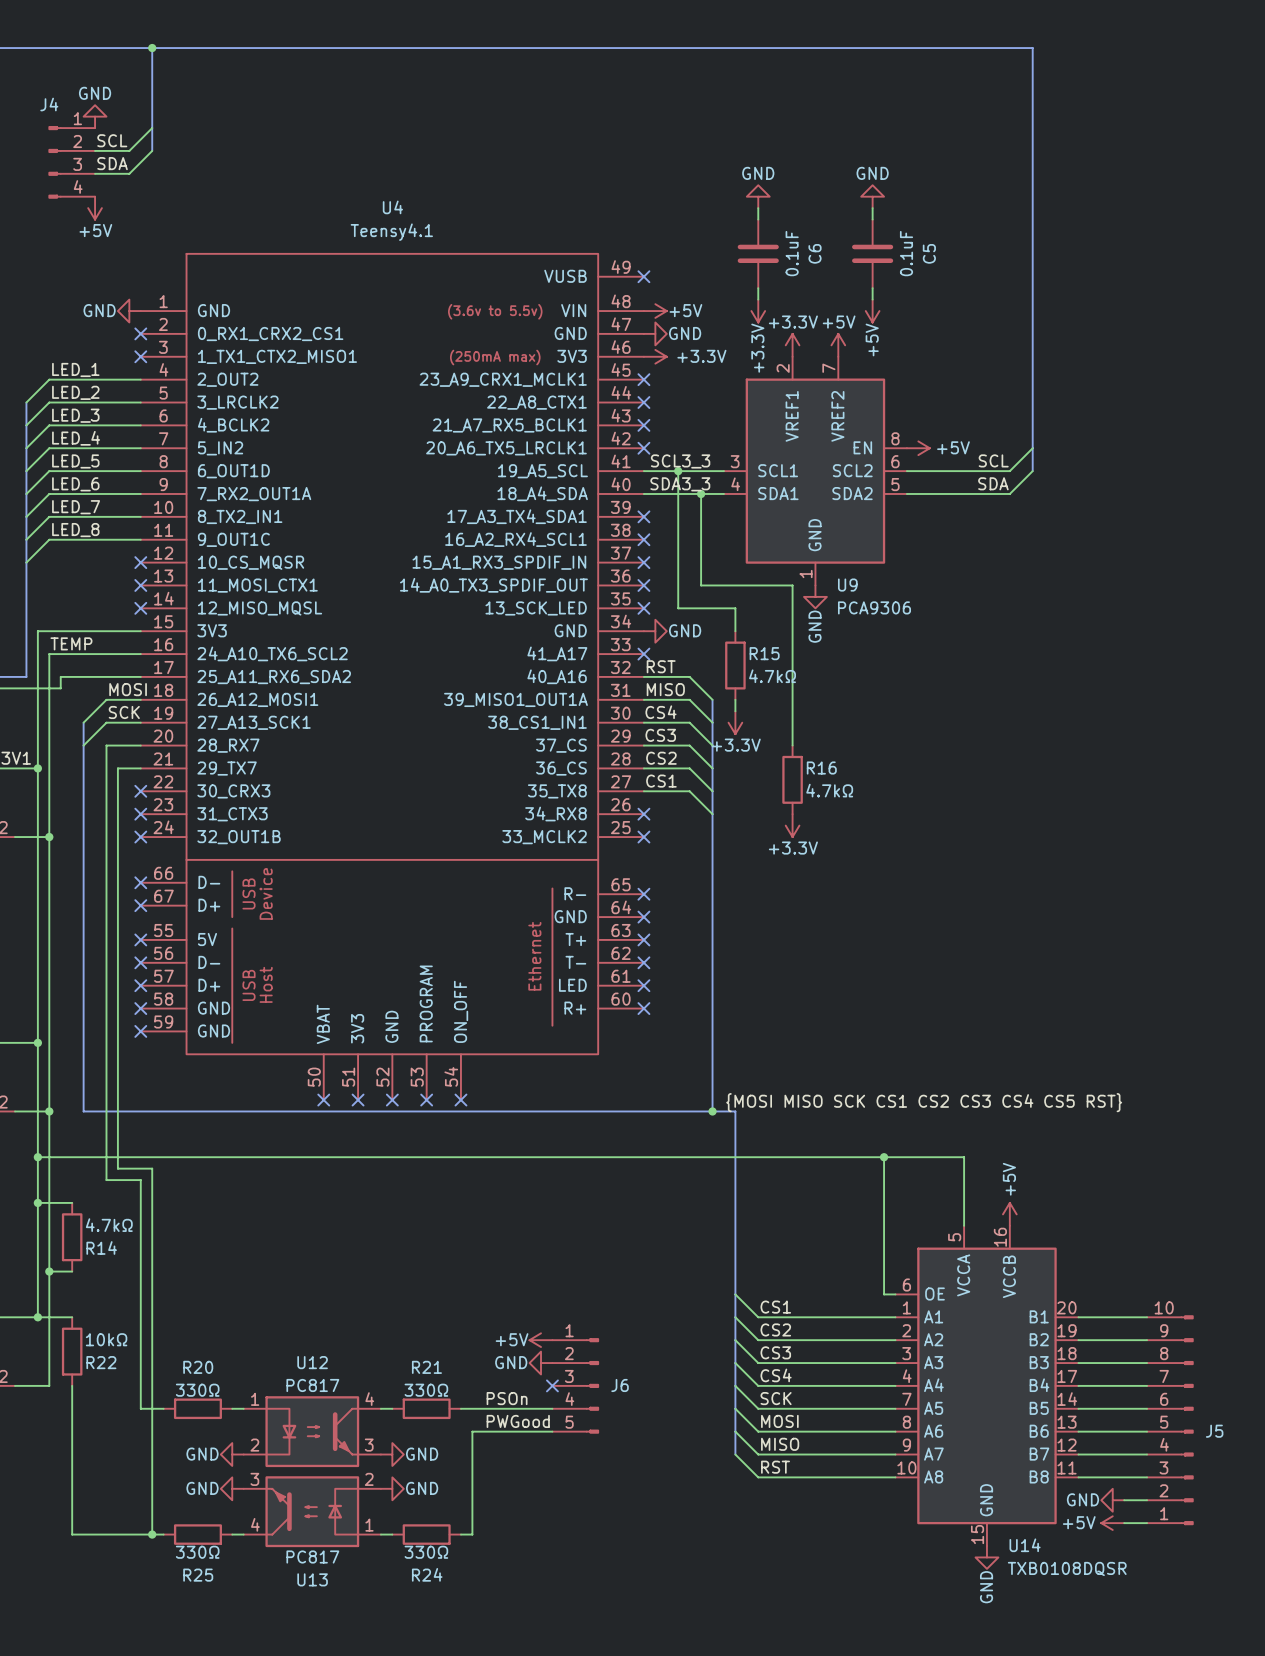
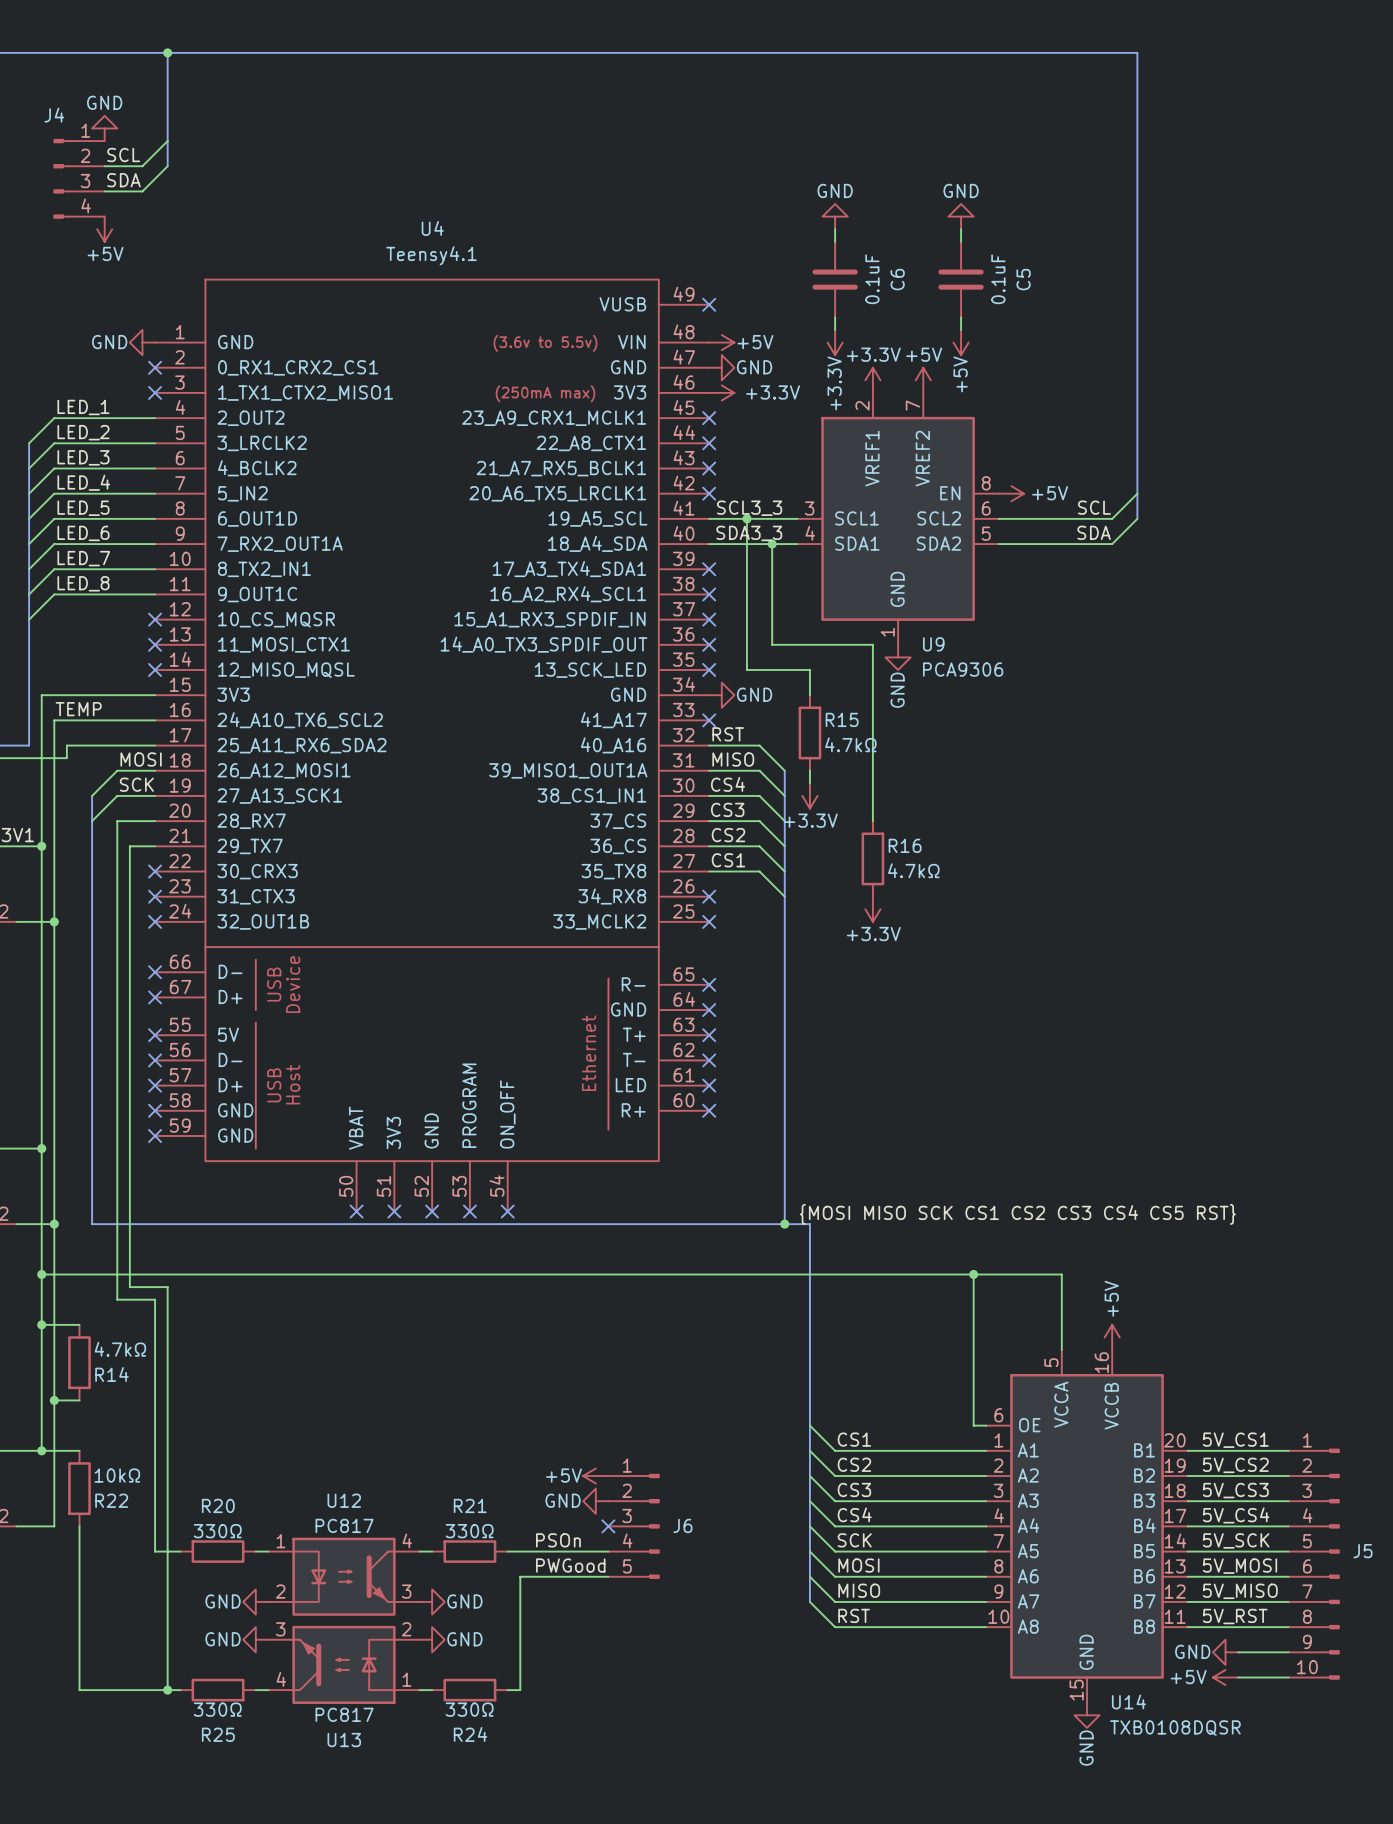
label: none -> 5V_CS1 (1235, 1440)
label: none -> 5V_CS2 (1235, 1465)
label: none -> 5V_CS3 (1235, 1490)
label: none -> 5V_CS4 (1236, 1515)
label: none -> 5V_SCK (1236, 1540)
J5 flip: as is (1187, 1420) -> up-down (1332, 1564)
label: none -> 5V_MOSI (1240, 1566)
label: none -> 5V_MISO (1240, 1591)
label: none -> 5V_RST (1235, 1616)

